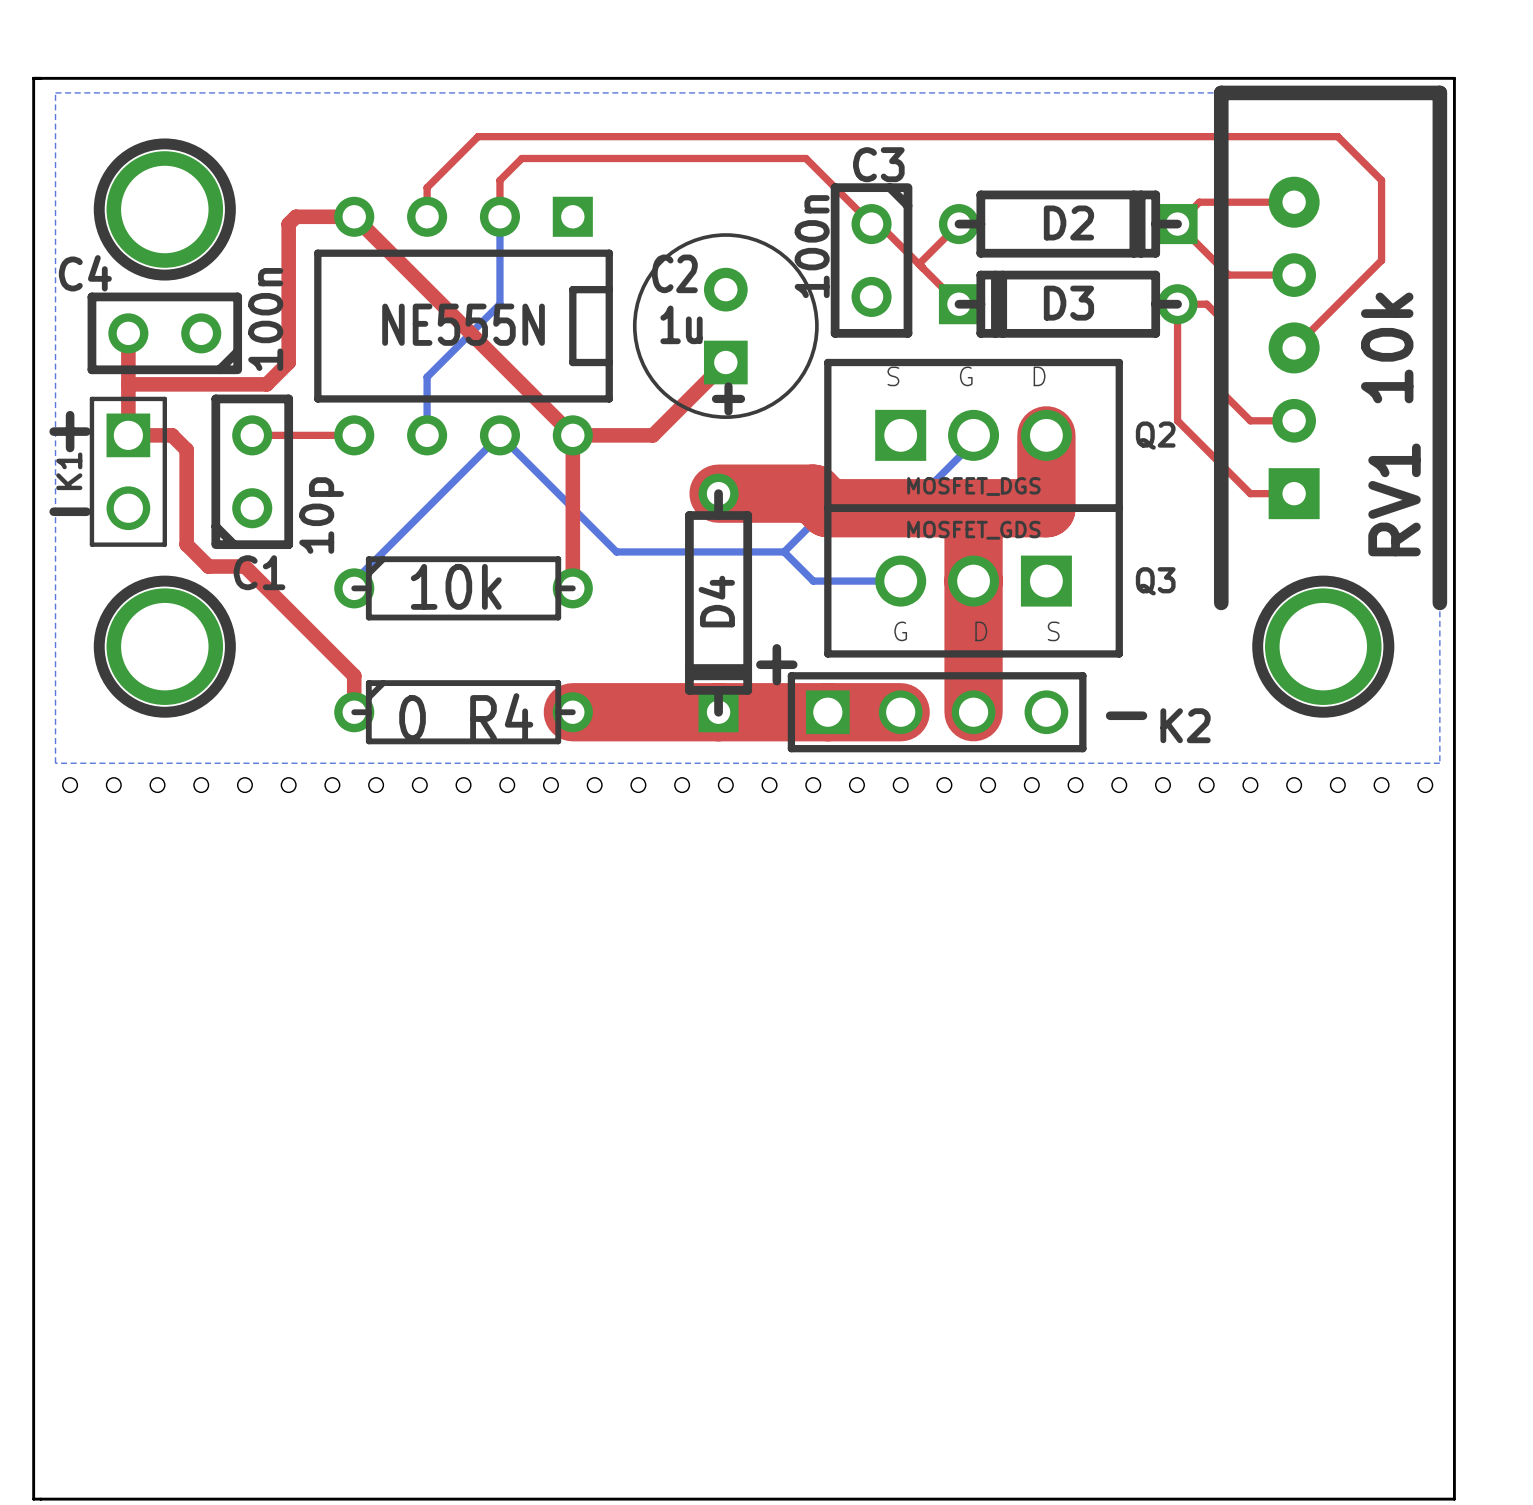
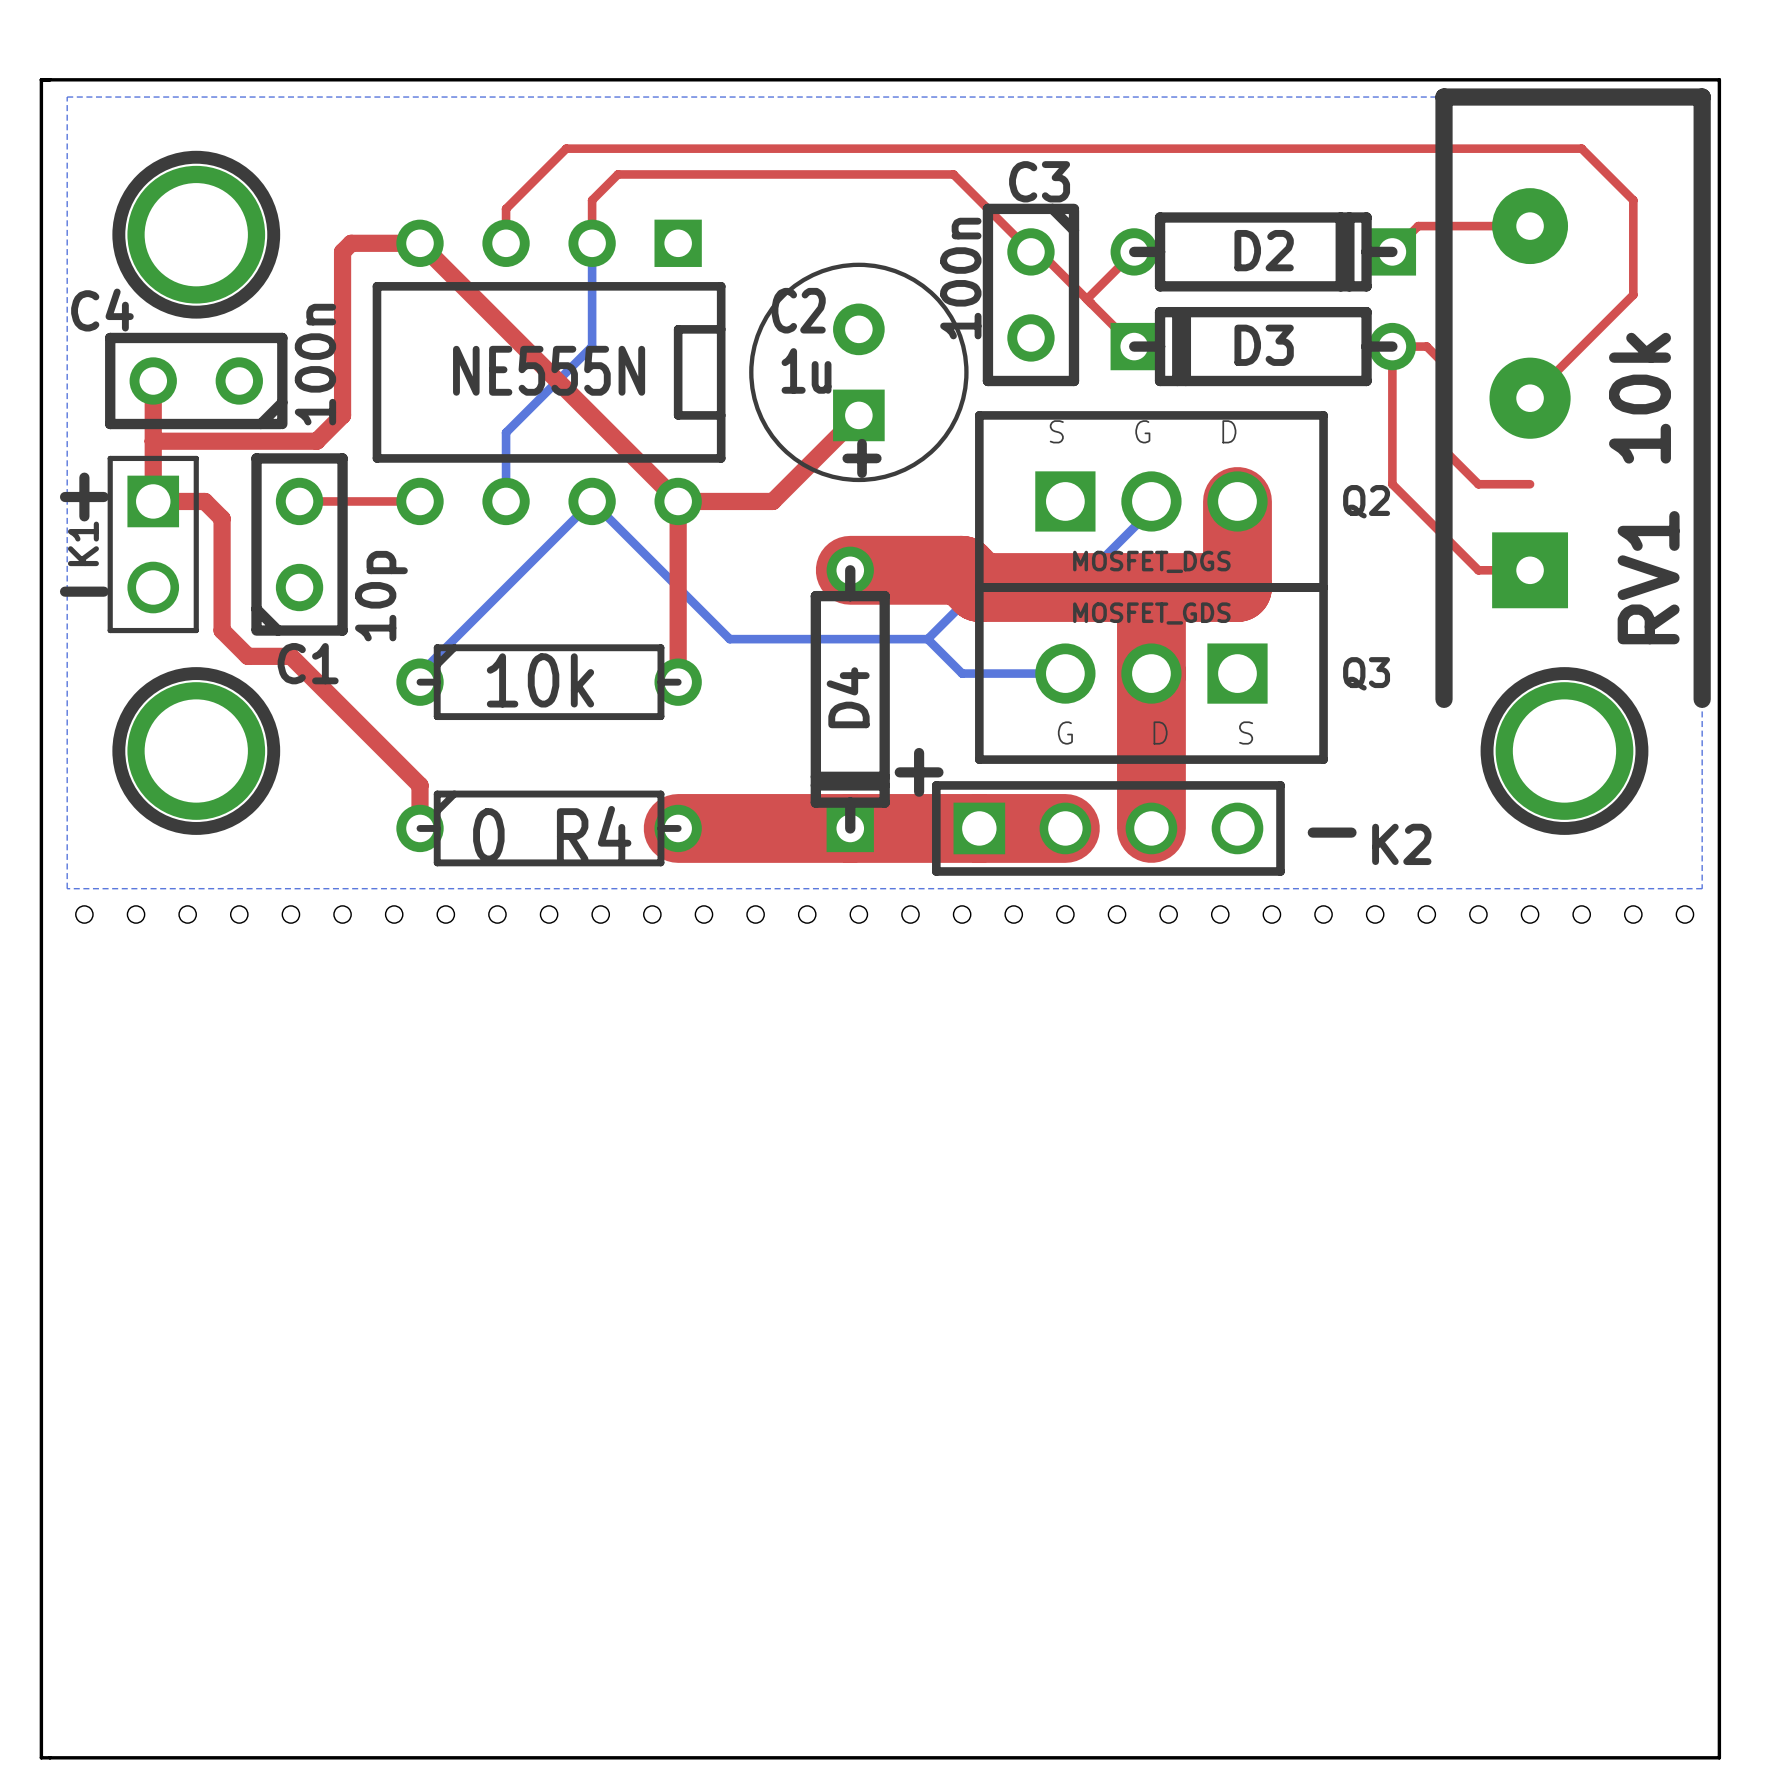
RV1 footprint: [1213, 85, 1448, 611] -> [1435, 88, 1711, 708]
top track: (1177, 224) (1228, 275) (1294, 275) -> none

